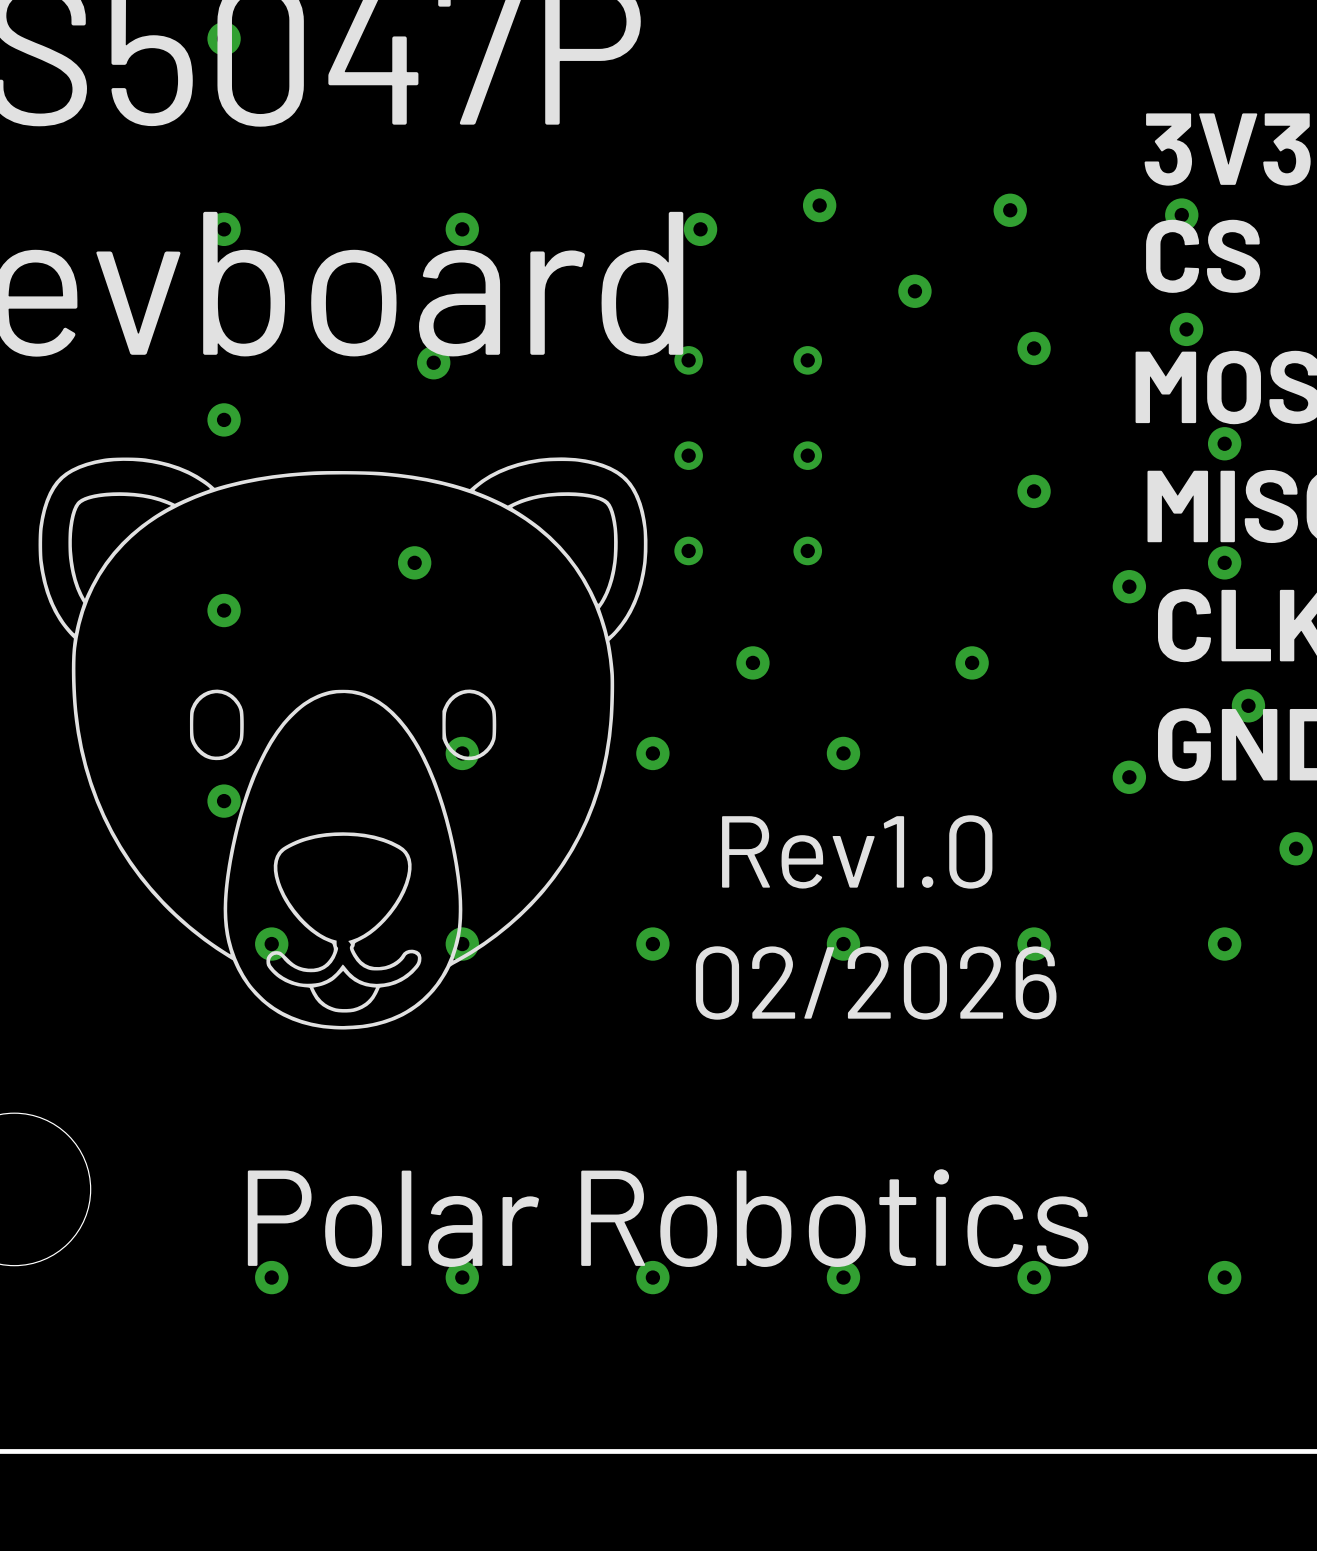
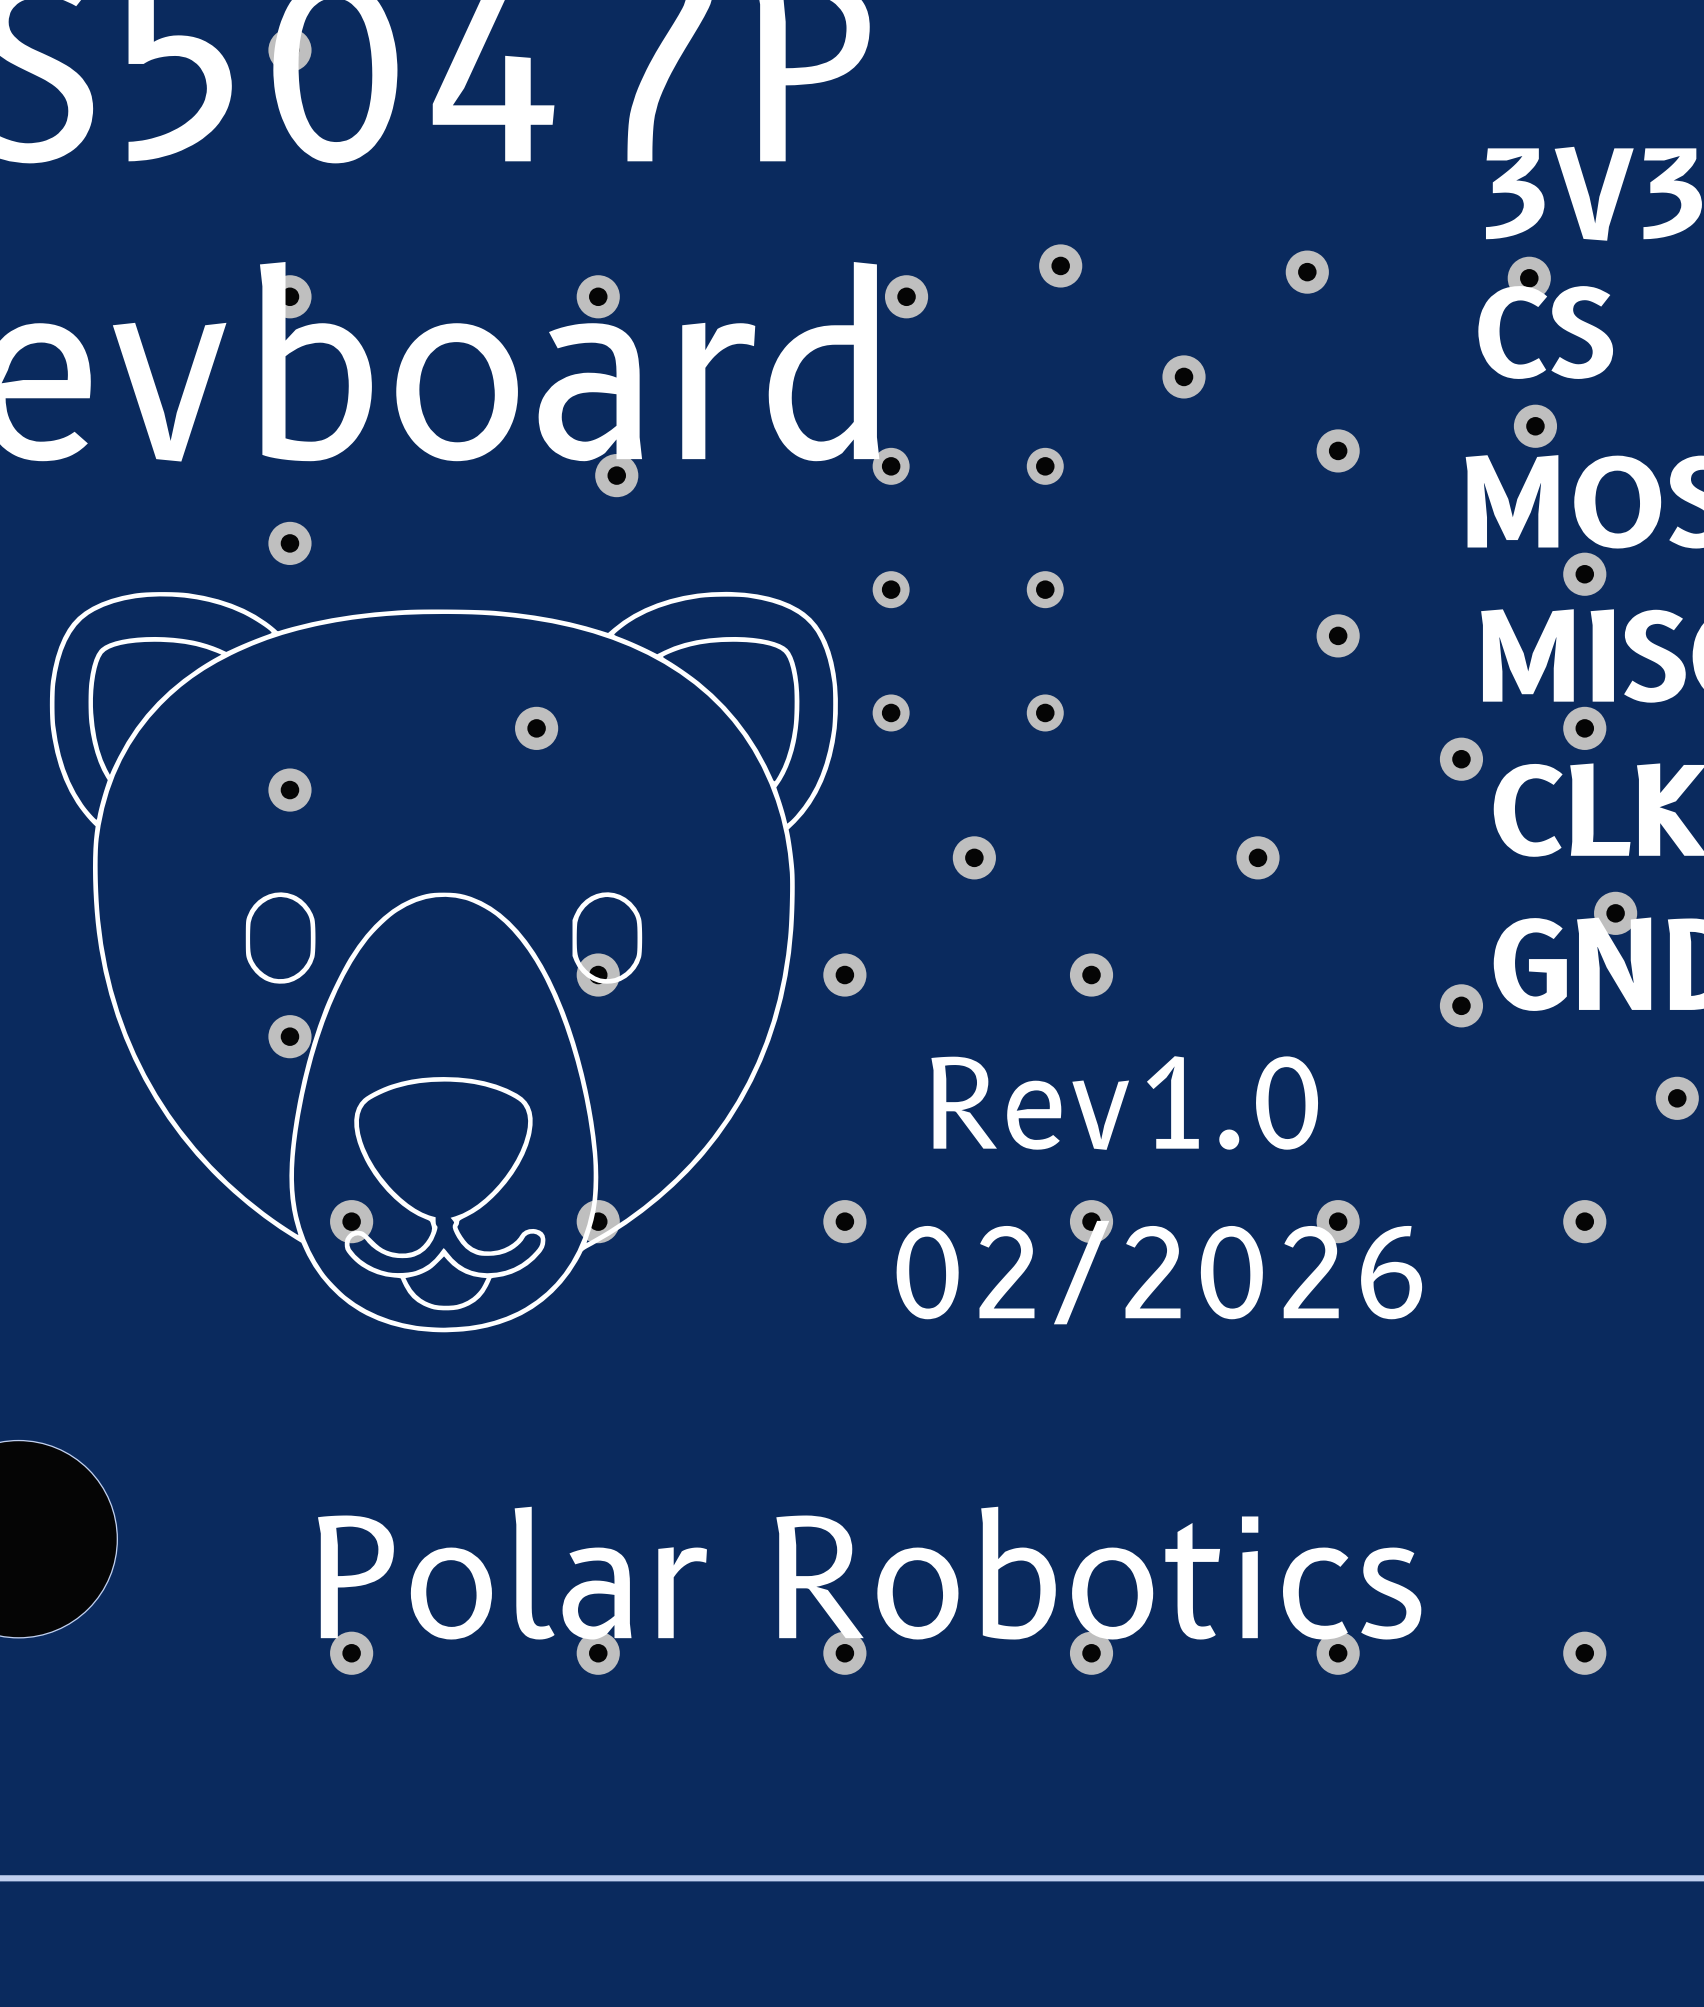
via position: (433, 362) -> (616, 475)

